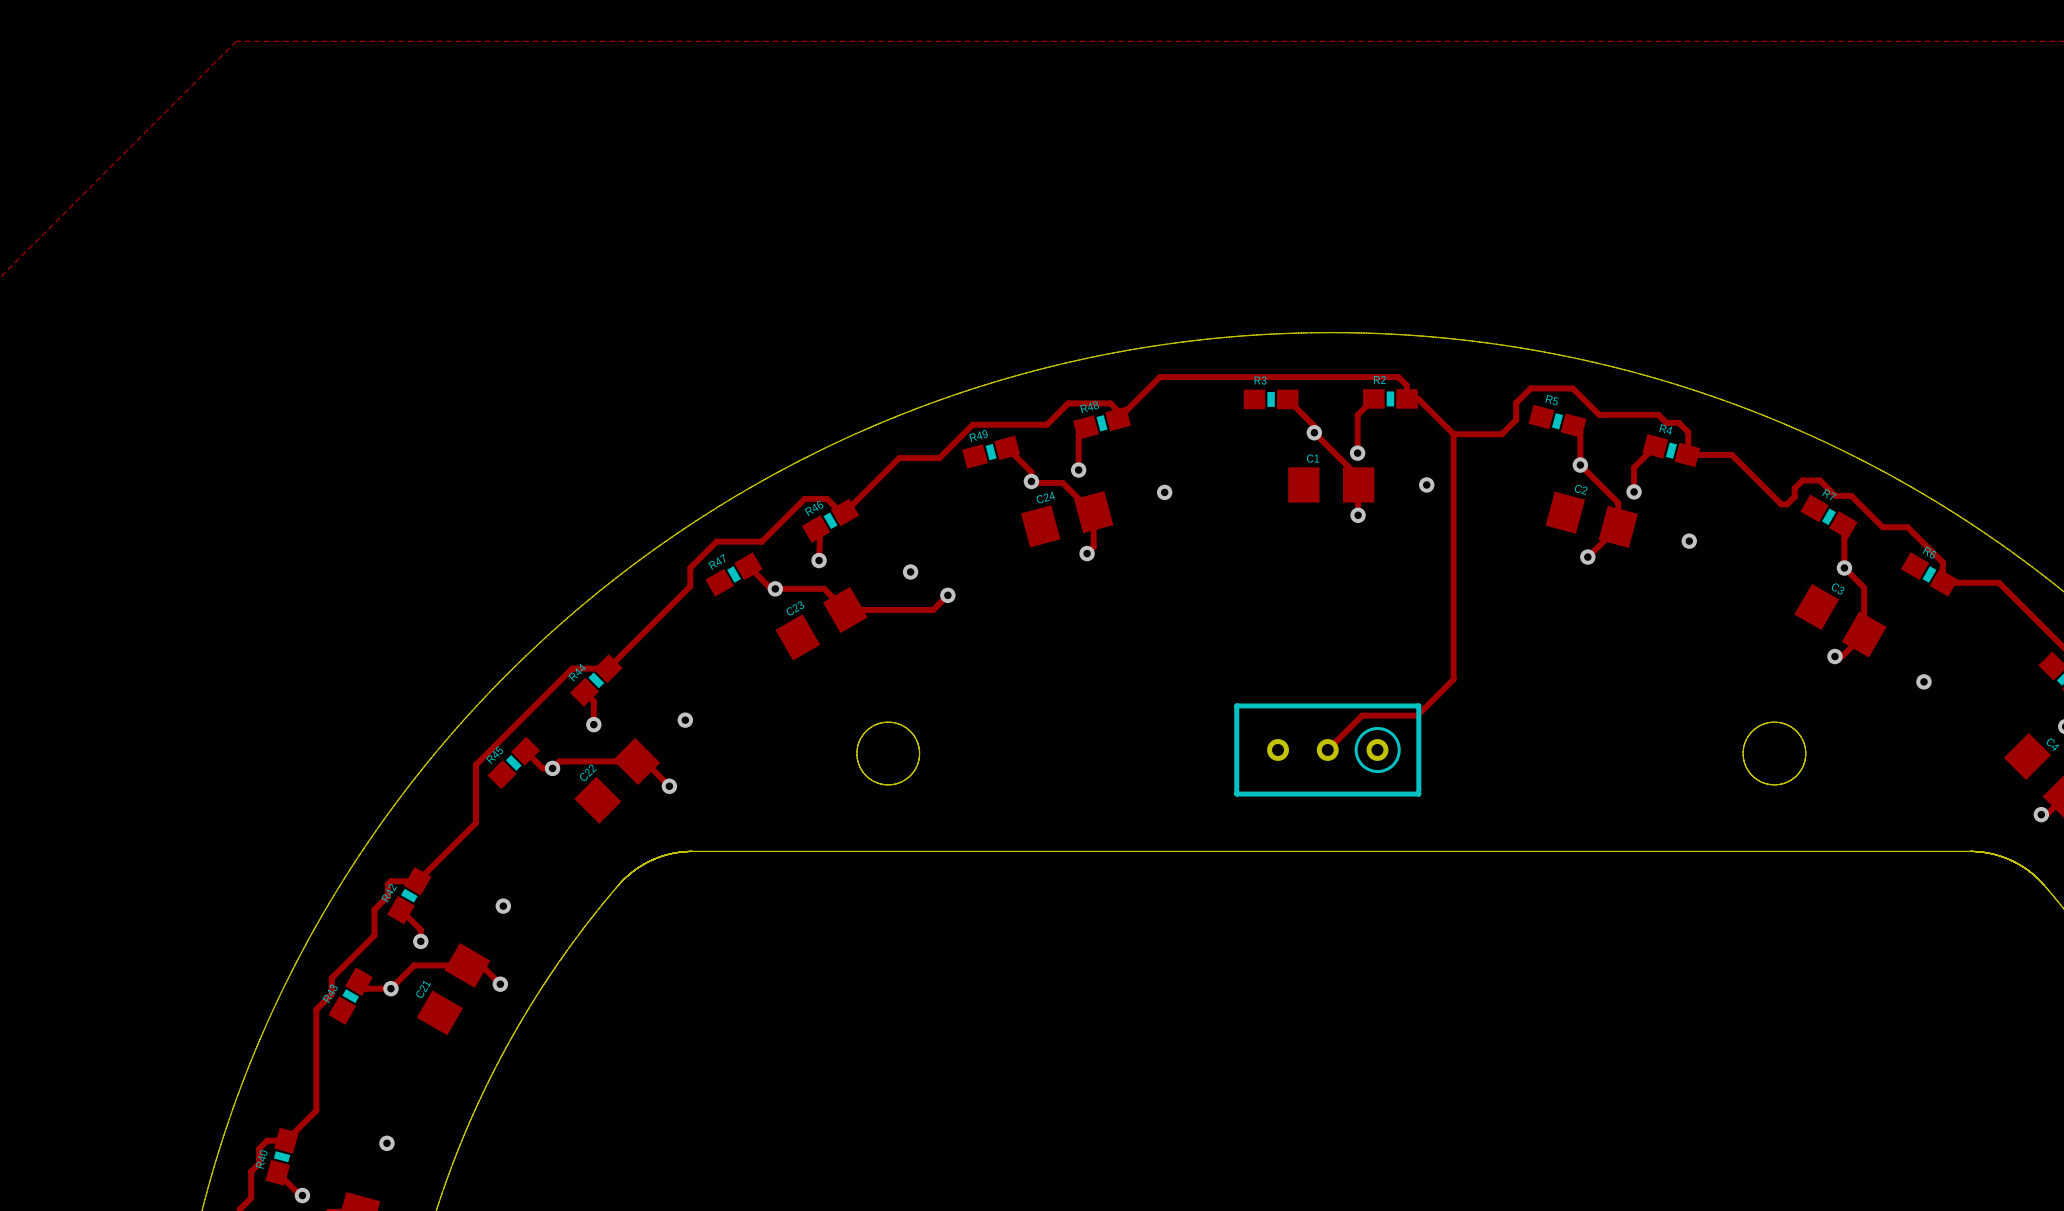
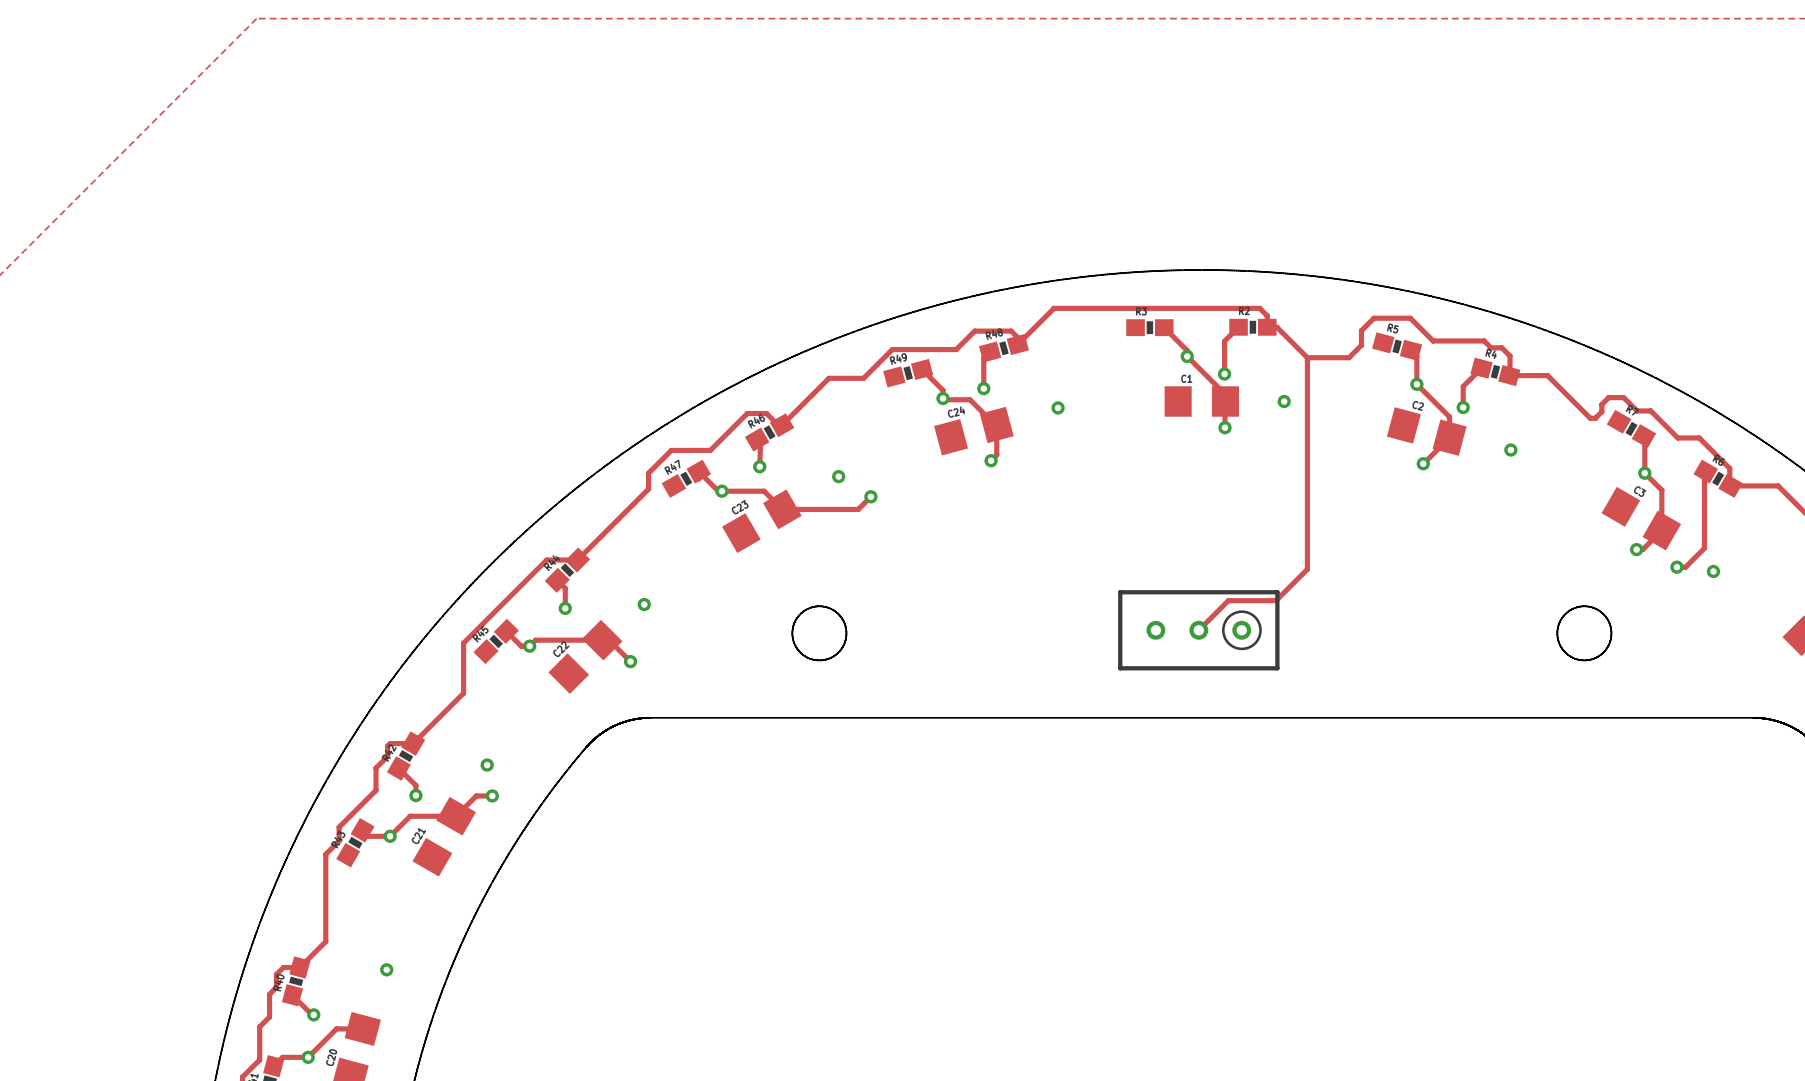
track: none -> (1705, 471) (1704, 548) (1685, 567) (1676, 567)
via: none -> (1676, 567)
track: none -> (492, 795) (476, 795) (456, 816)
track: (481, 965) (500, 984) -> none
via position: (500, 984) -> (492, 795)

